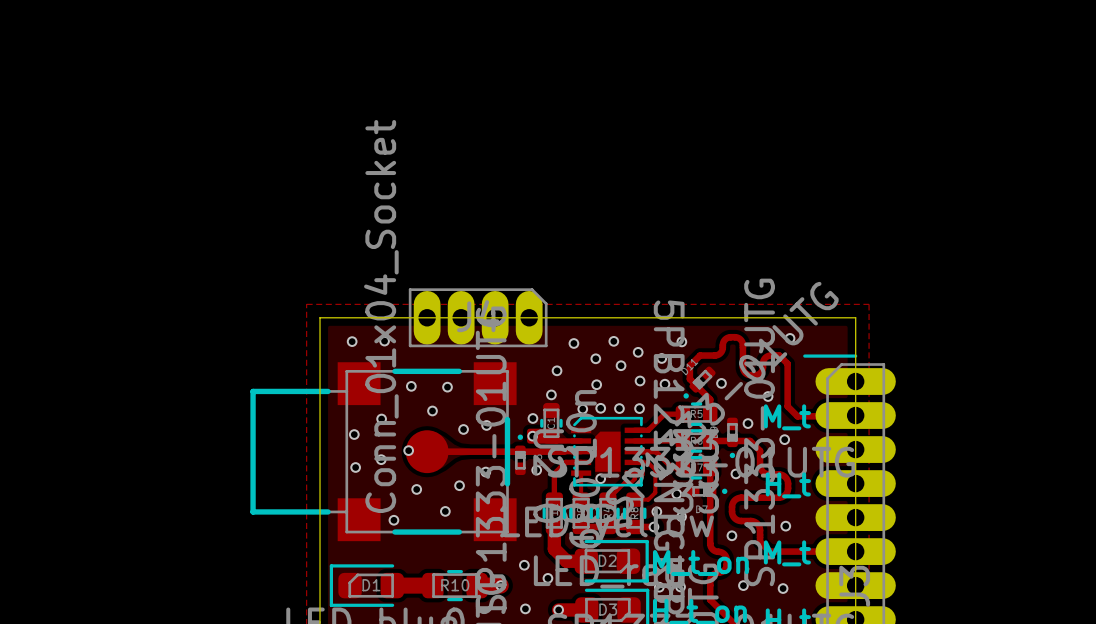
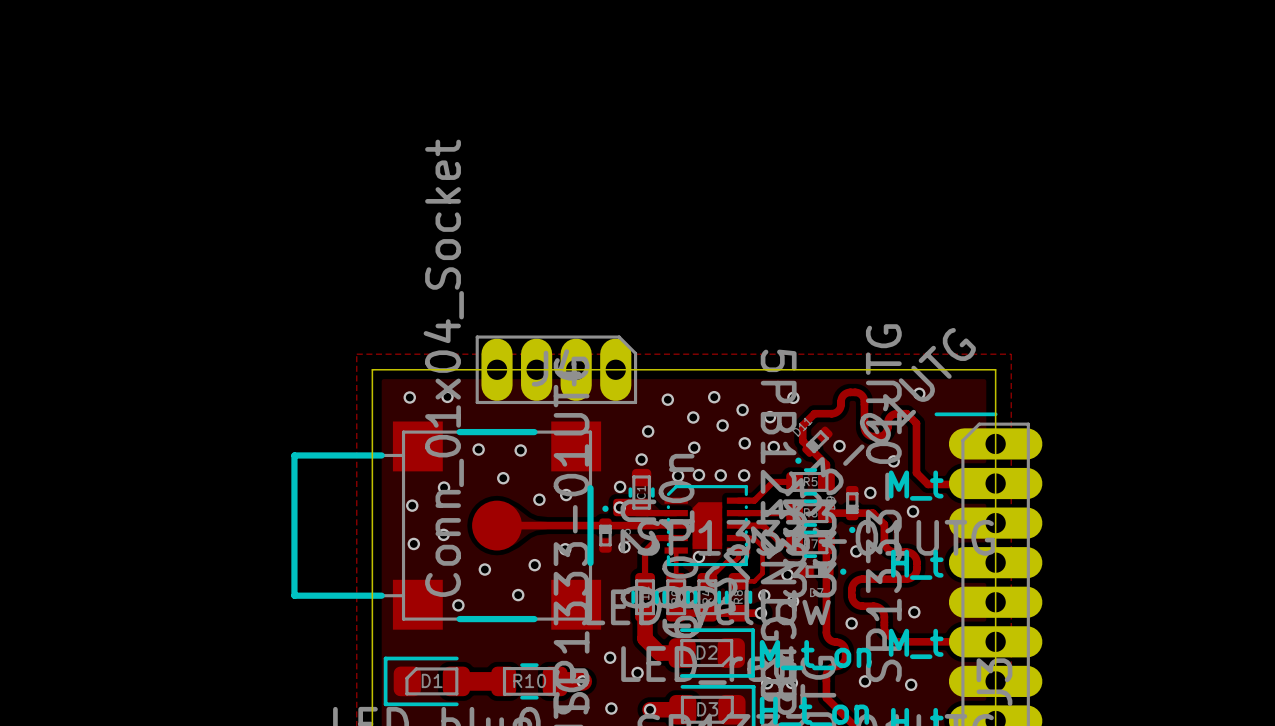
via: (408, 450) -> none

